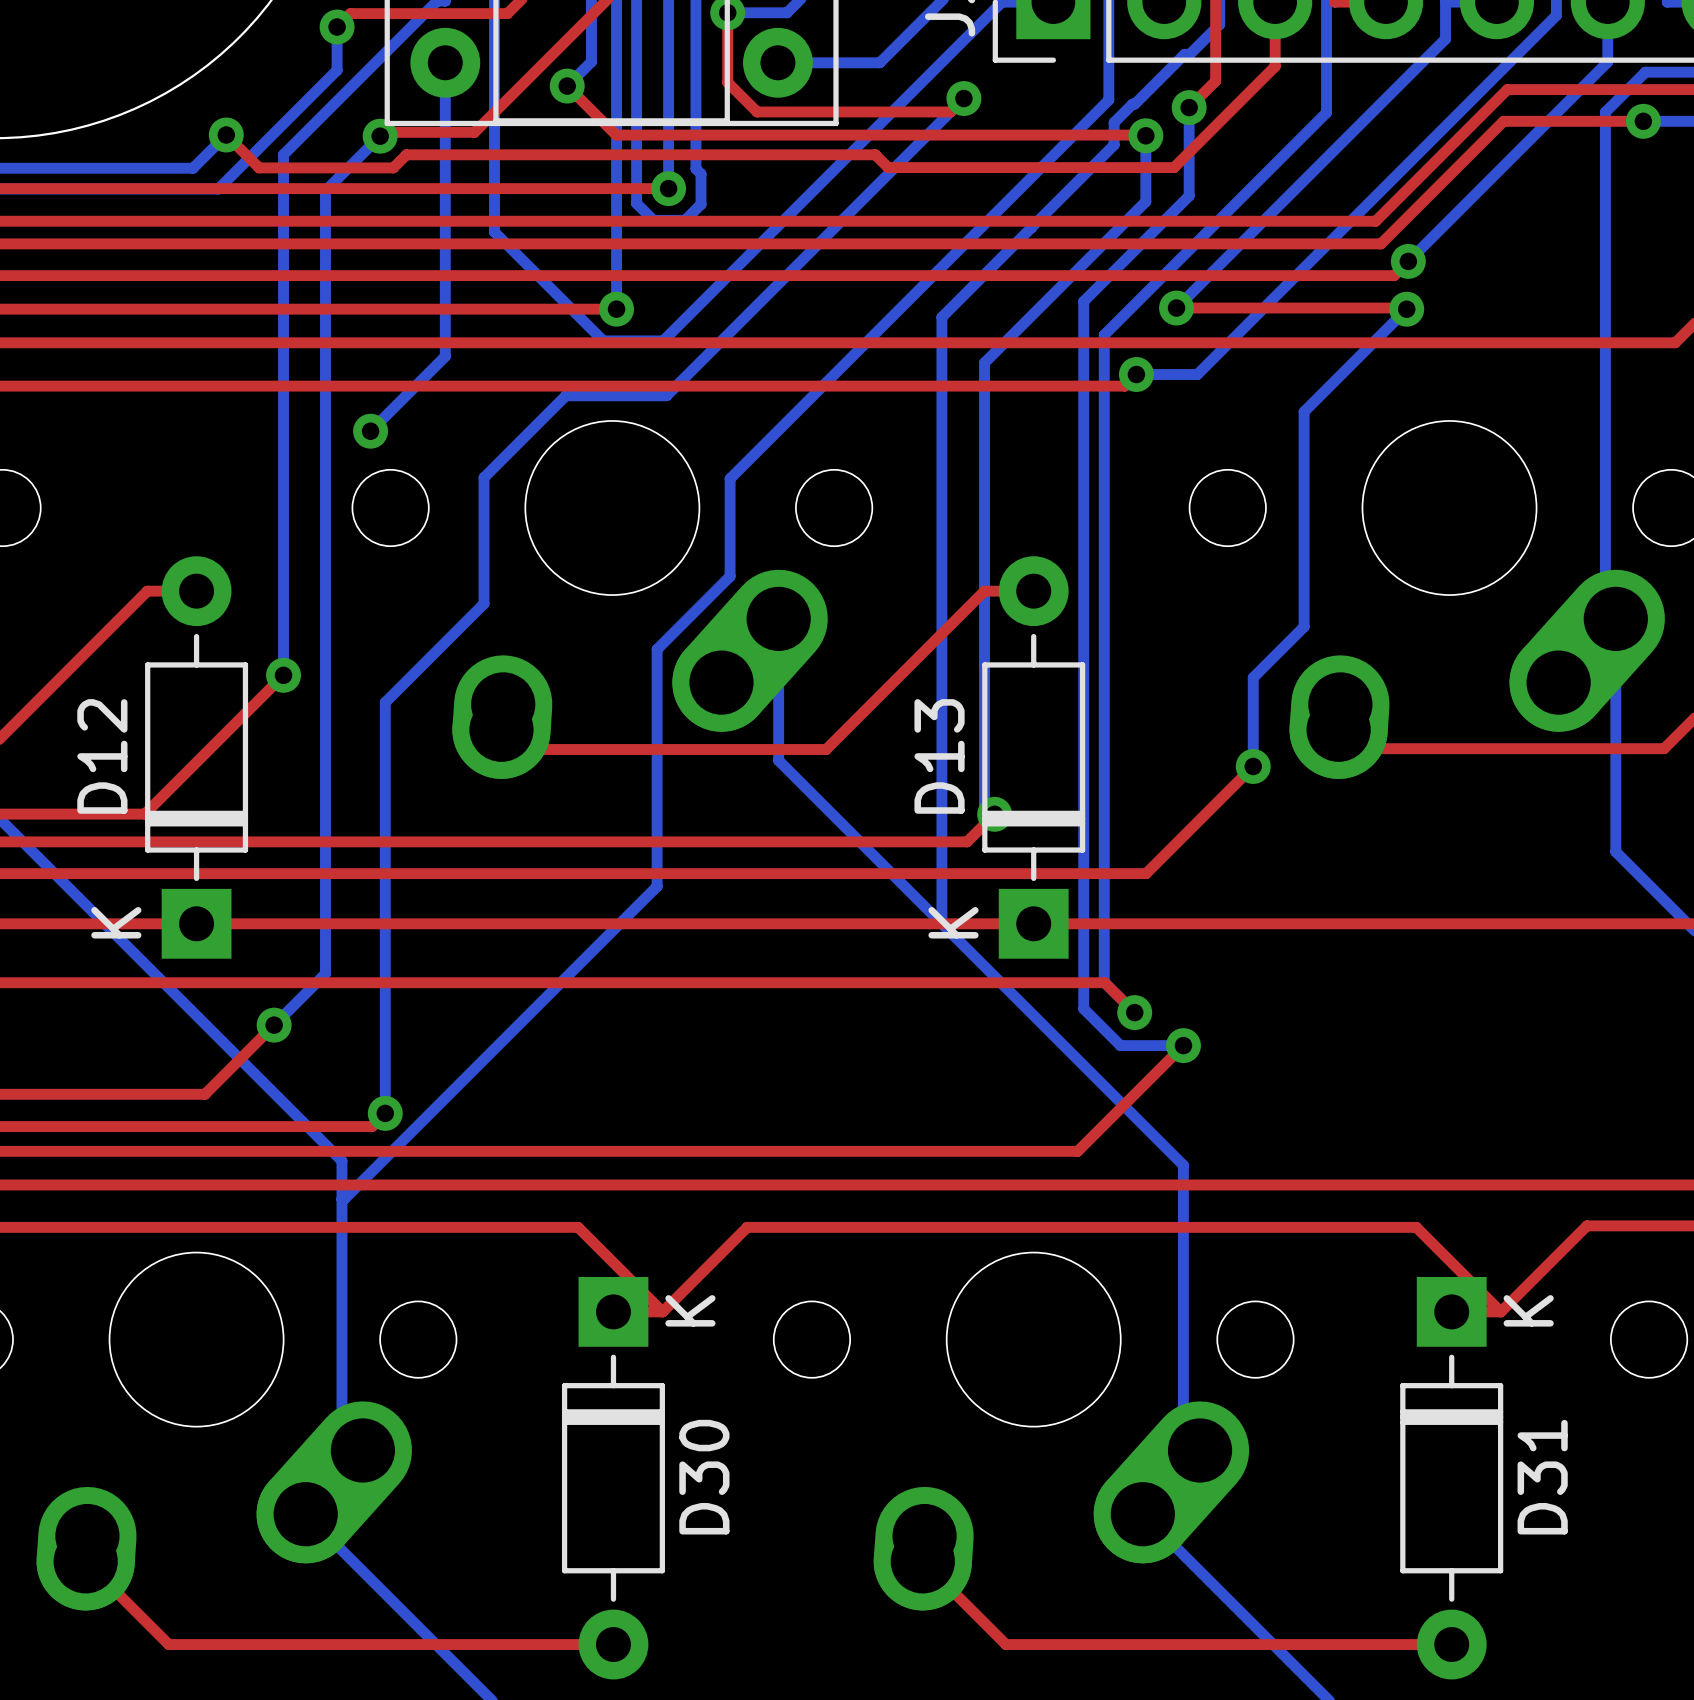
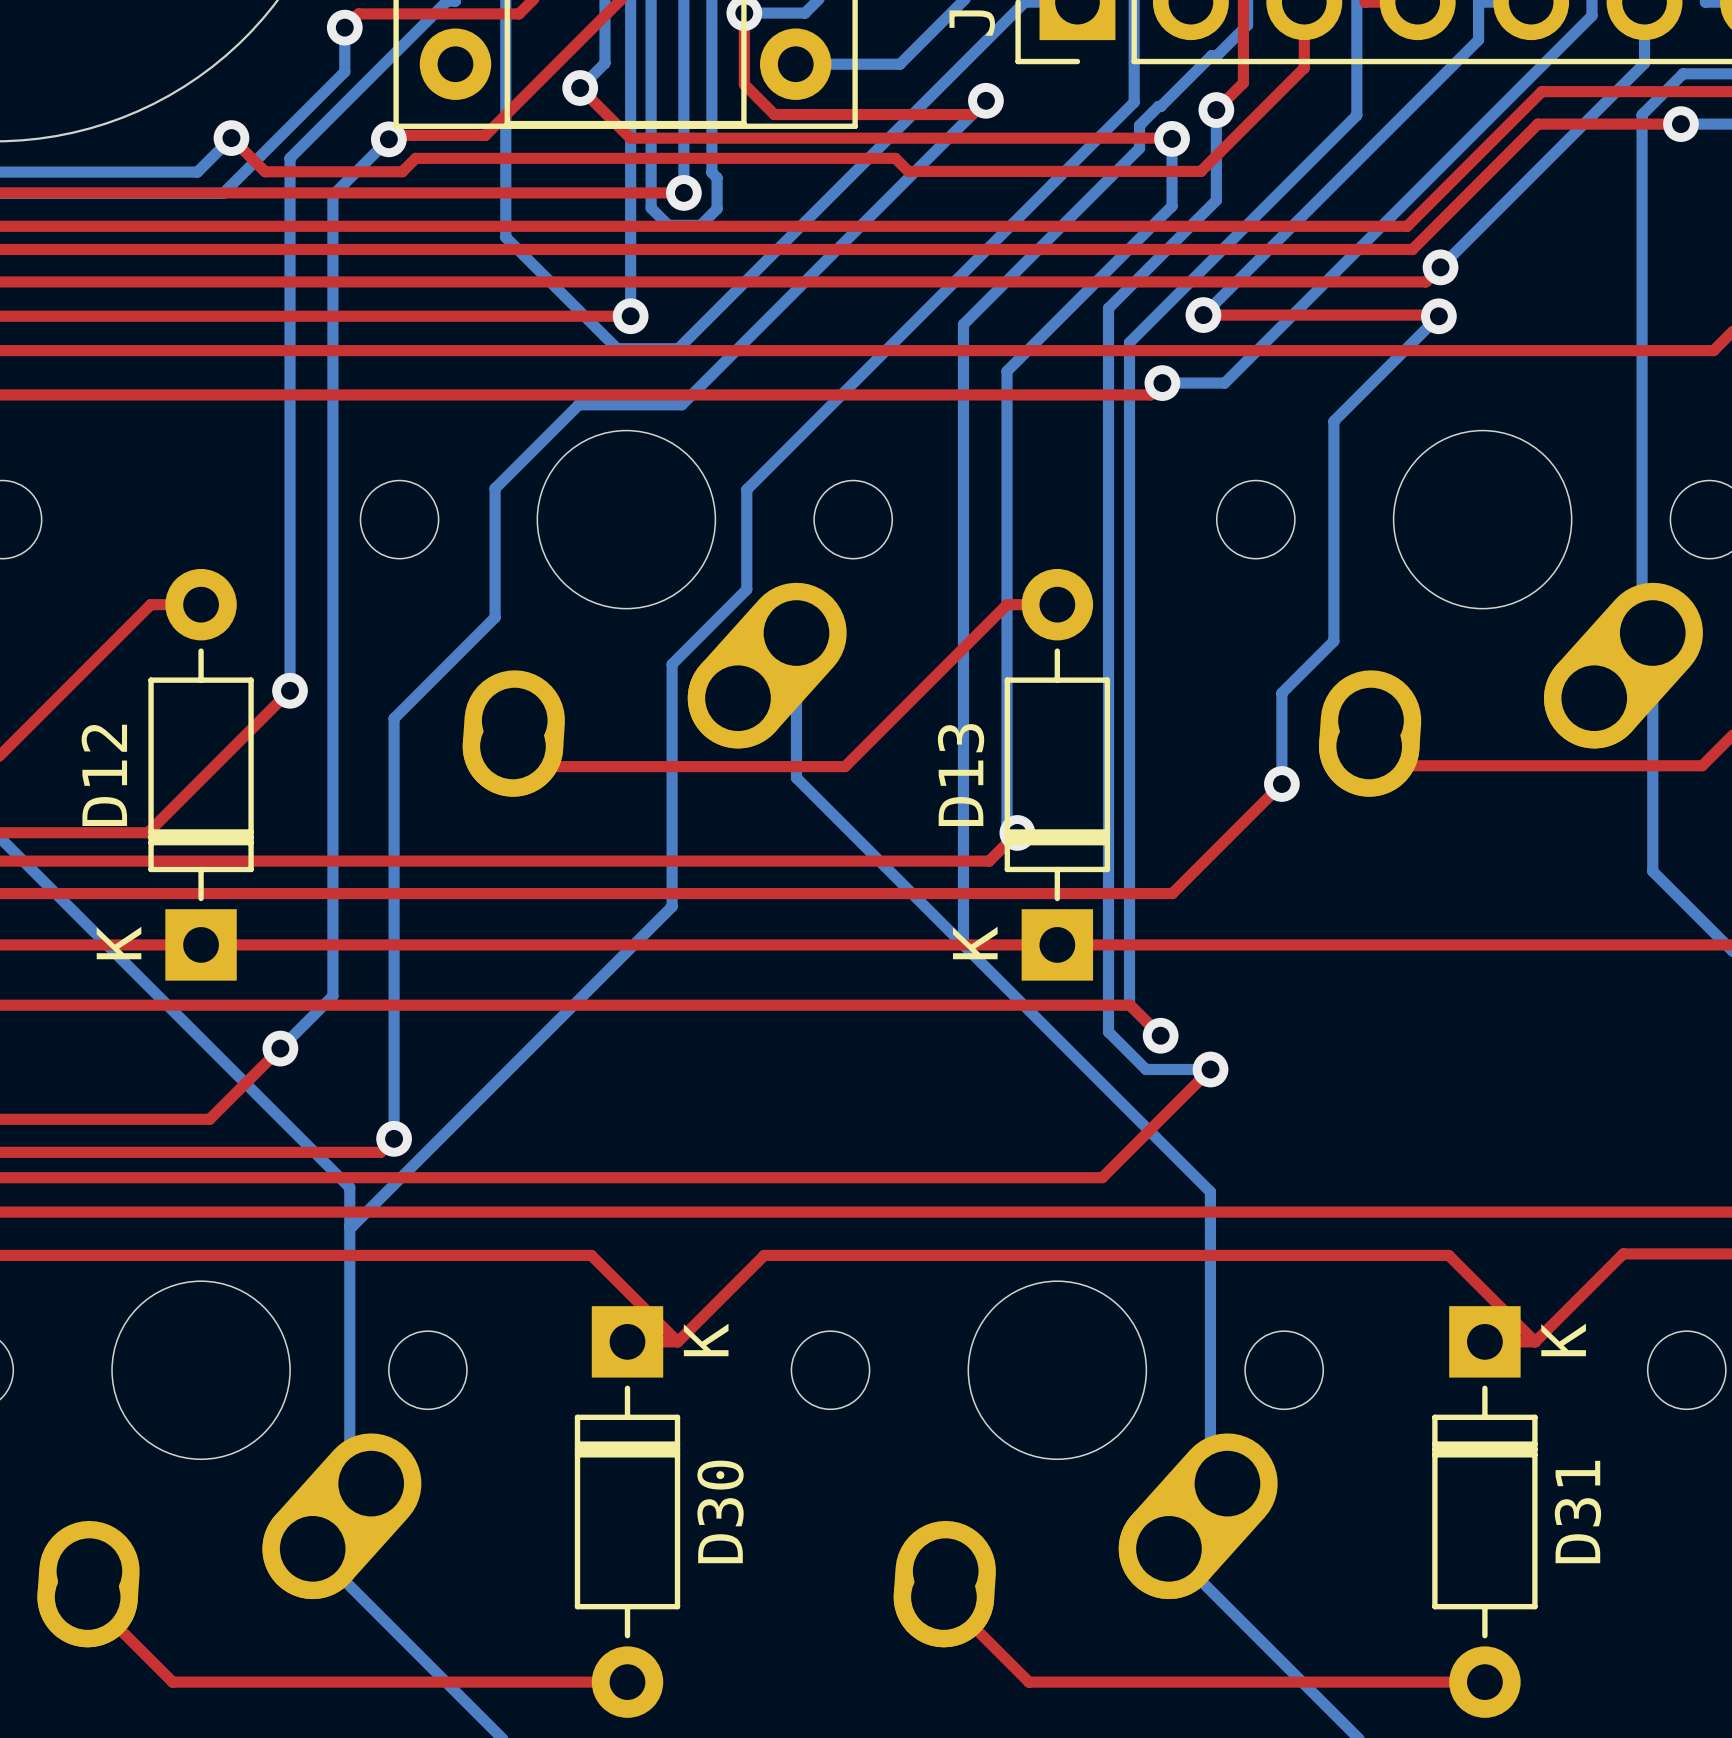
bottom track: (445, 62) (445, 356) (370, 431) -> none
via: (370, 431) -> none

